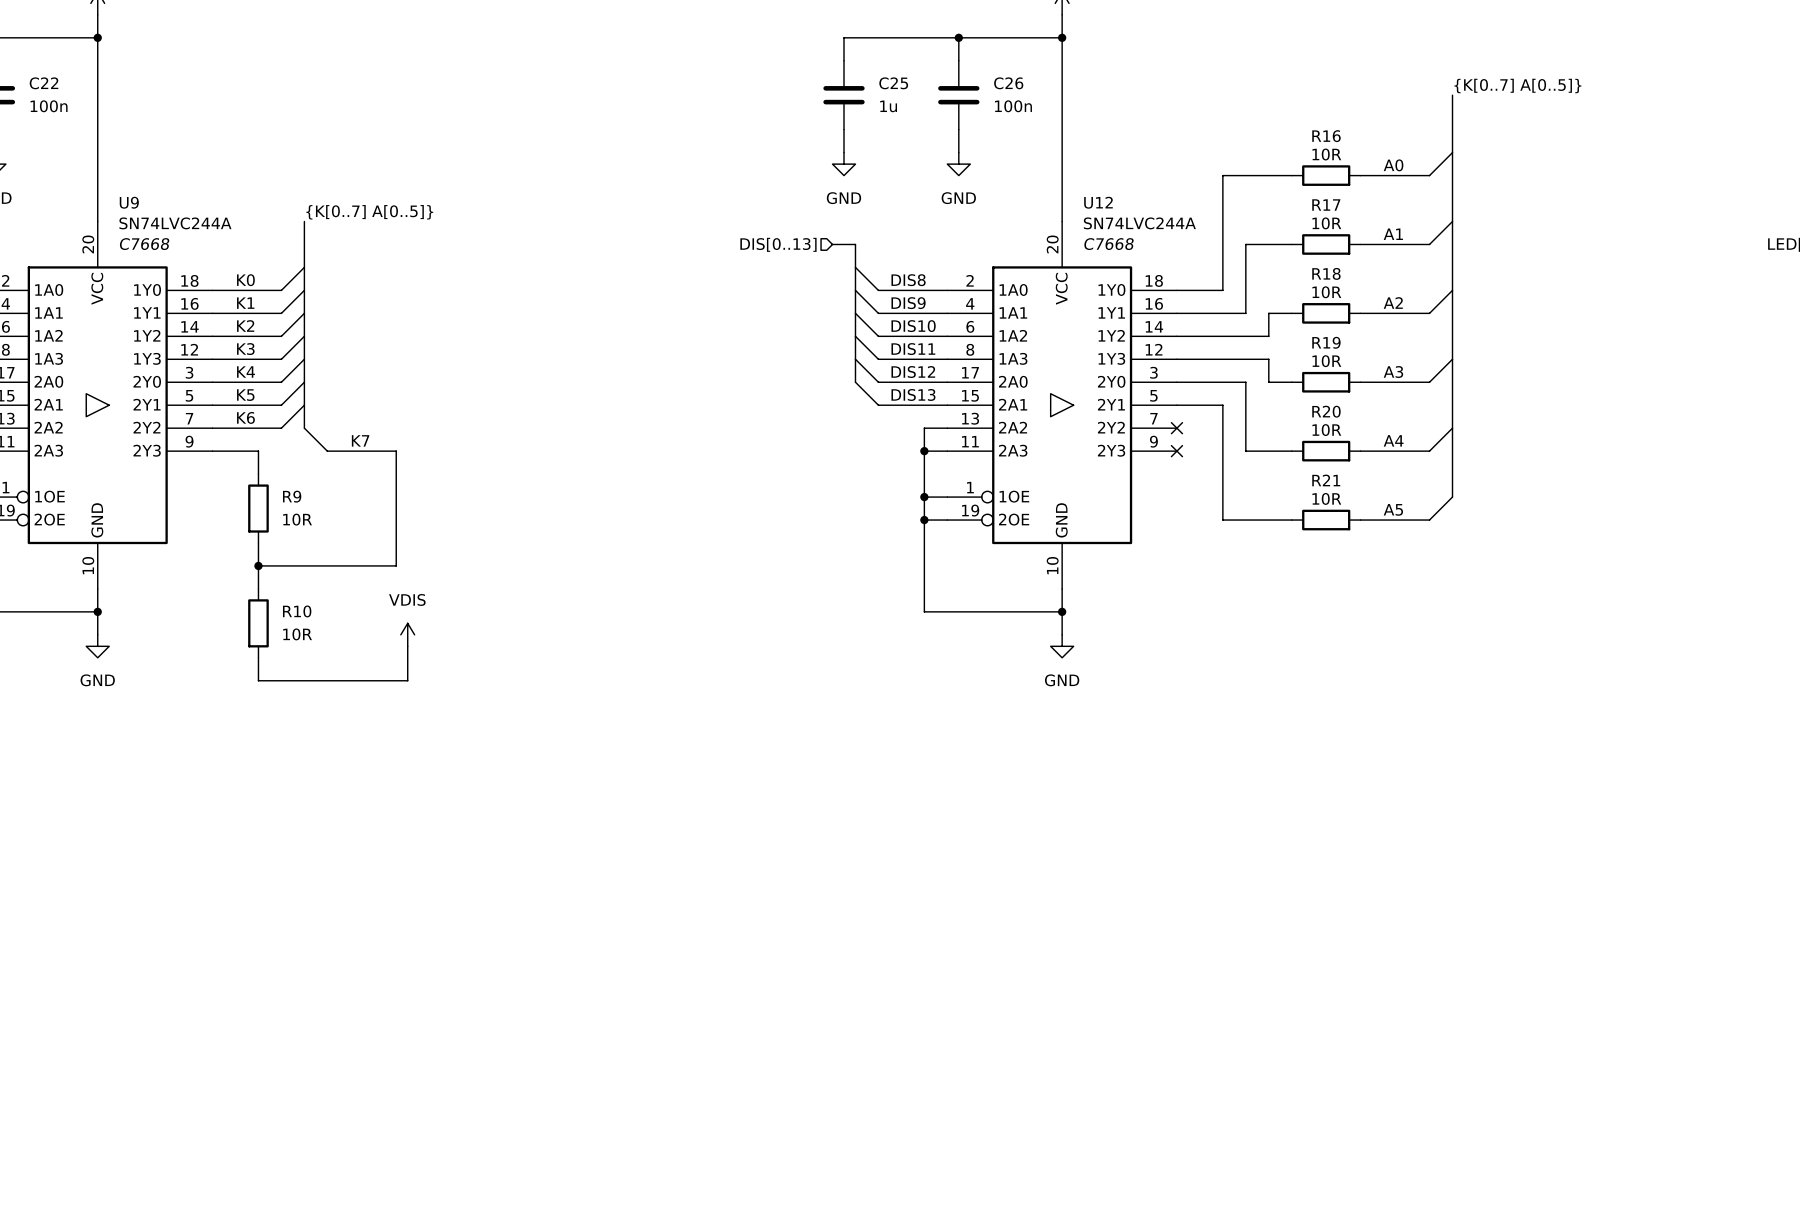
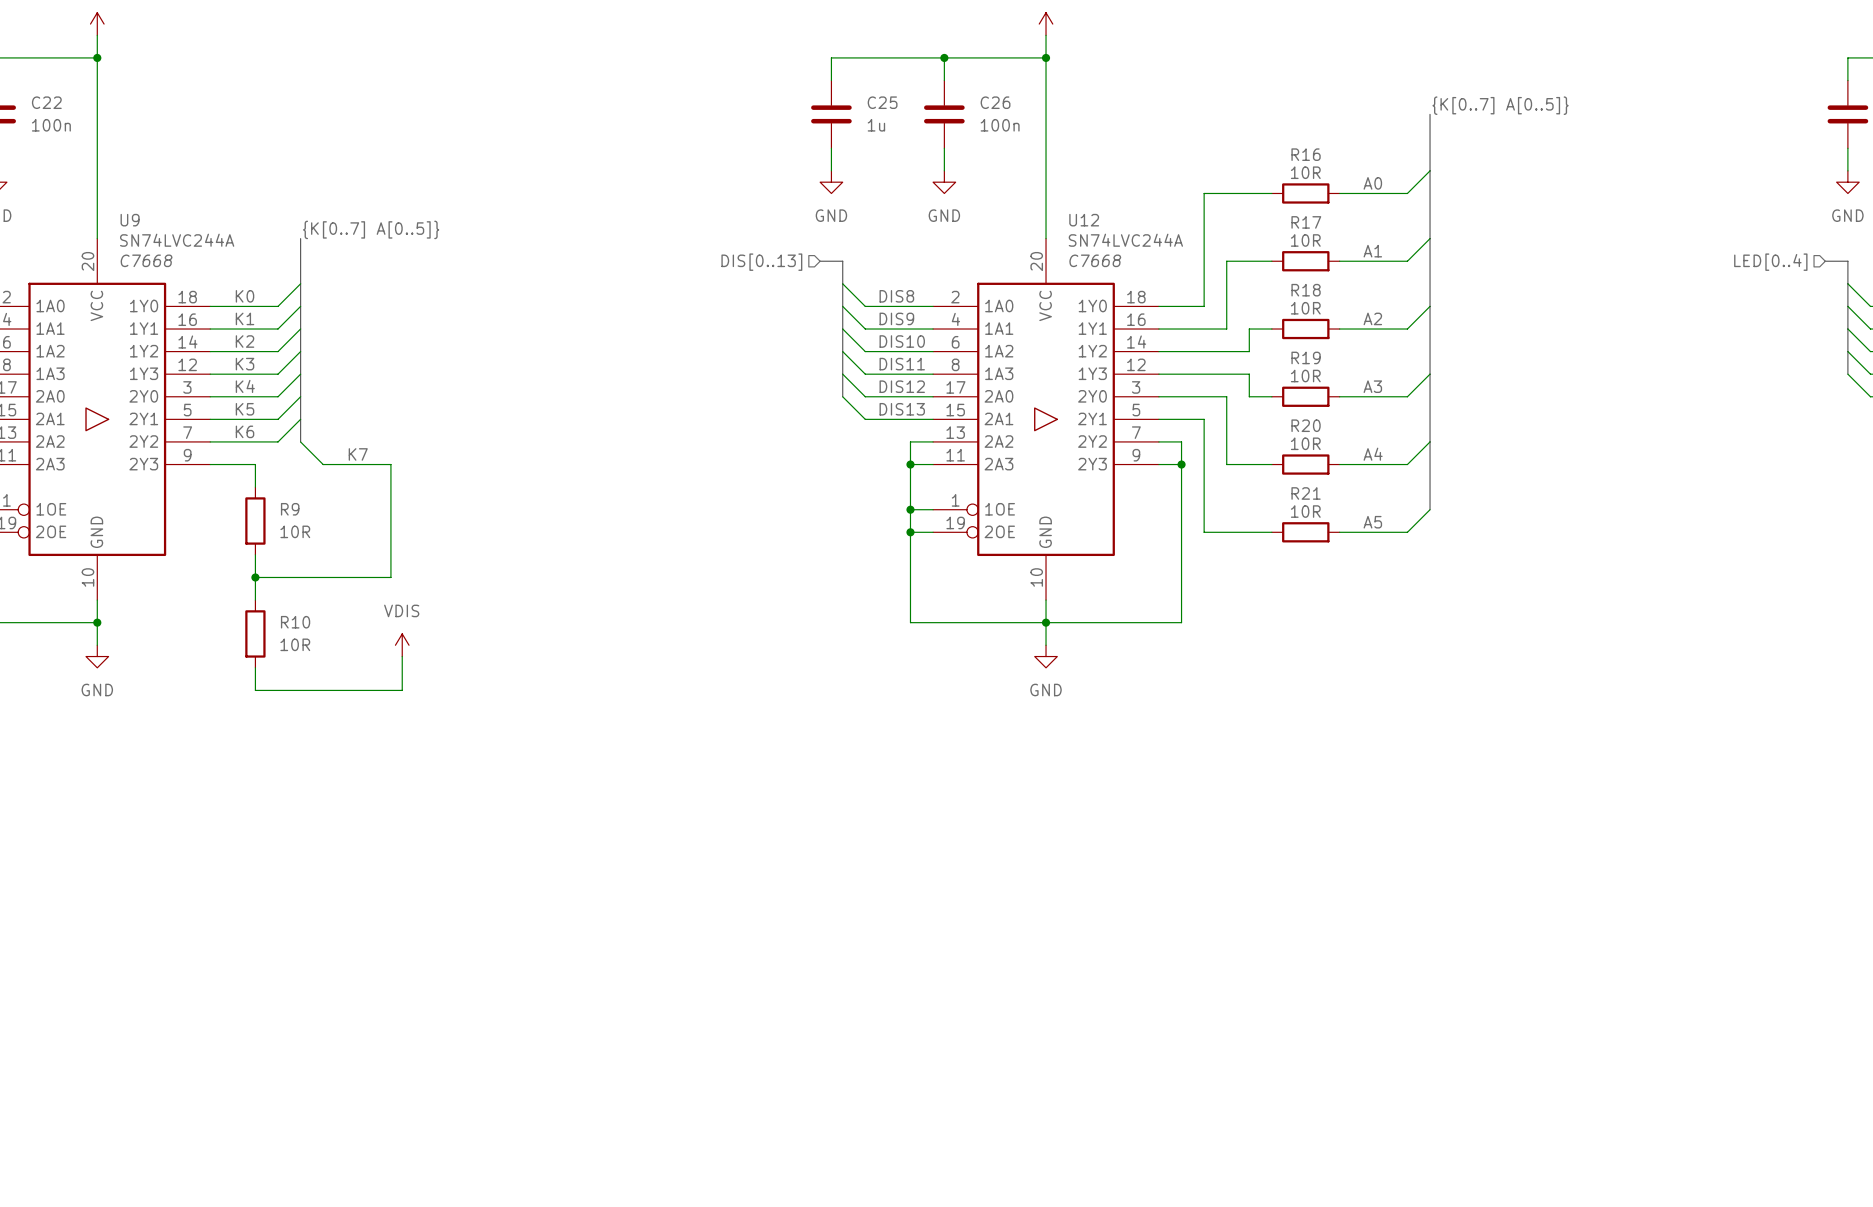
wire: none -> (1158, 441) (1181, 441) (1181, 622) (1046, 622)
no-connect mark: (1176, 428) -> none
wire: none -> (1158, 464) (1181, 464)
no-connect mark: (1176, 451) -> none
junction: none -> (1181, 464)

